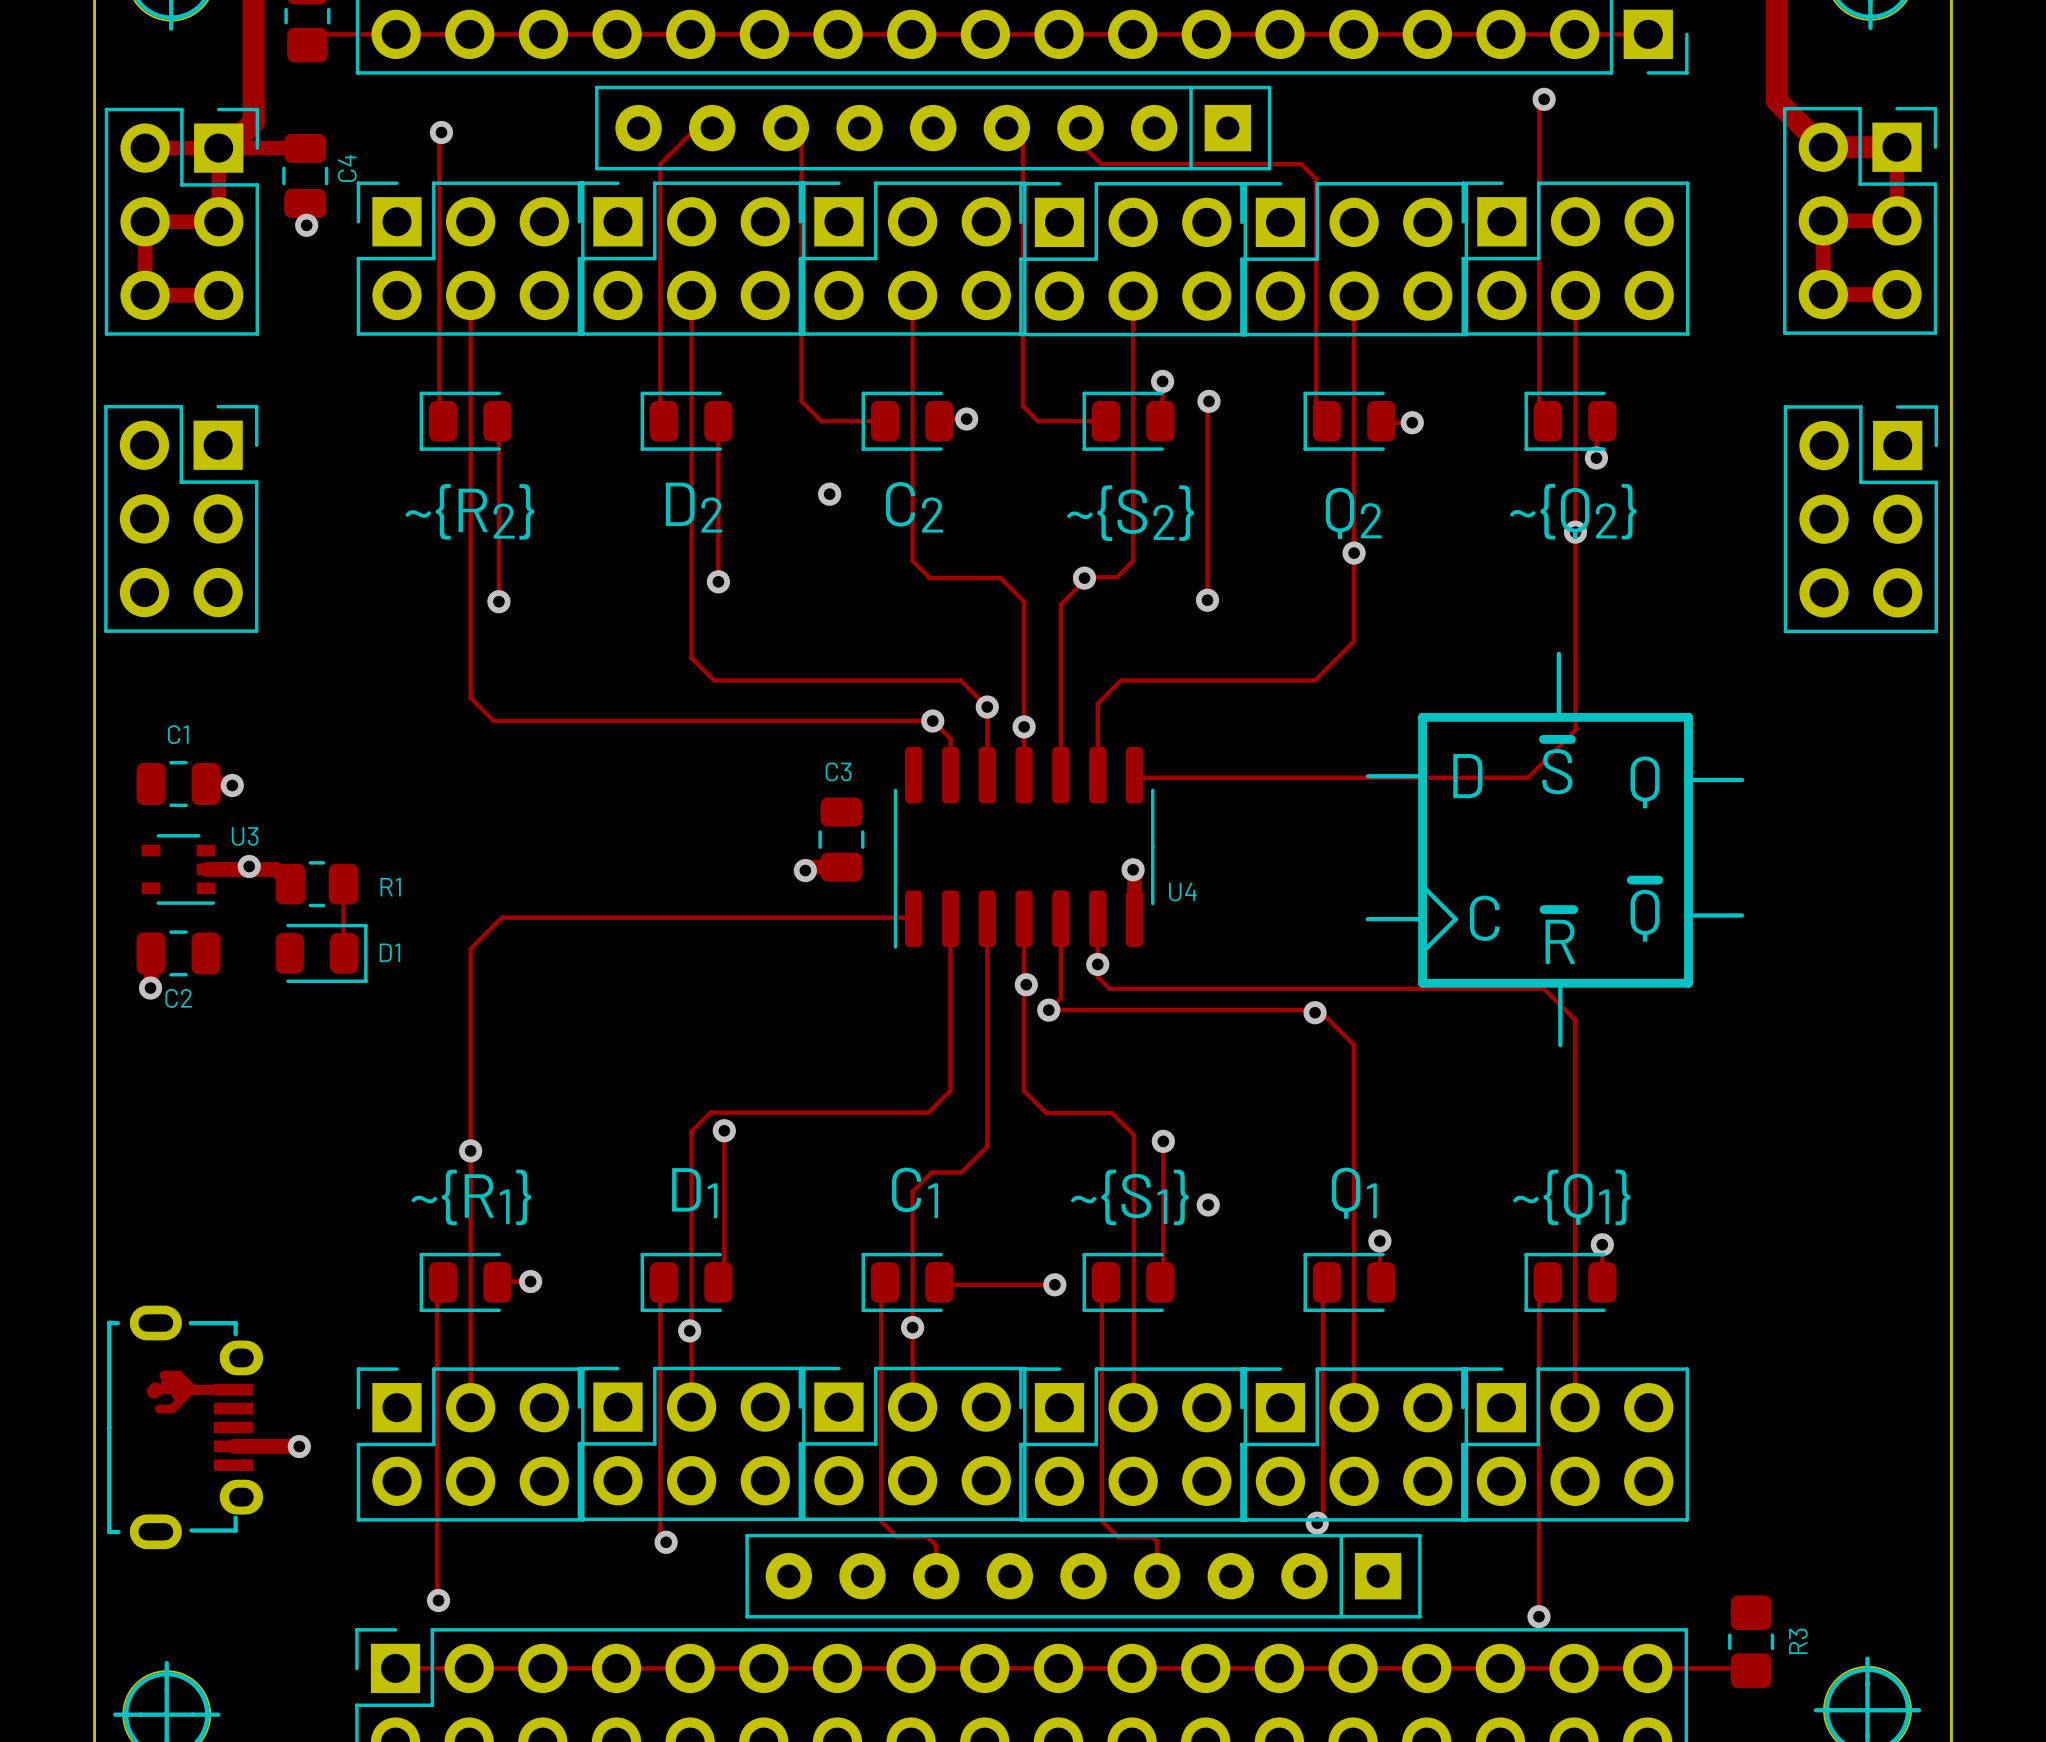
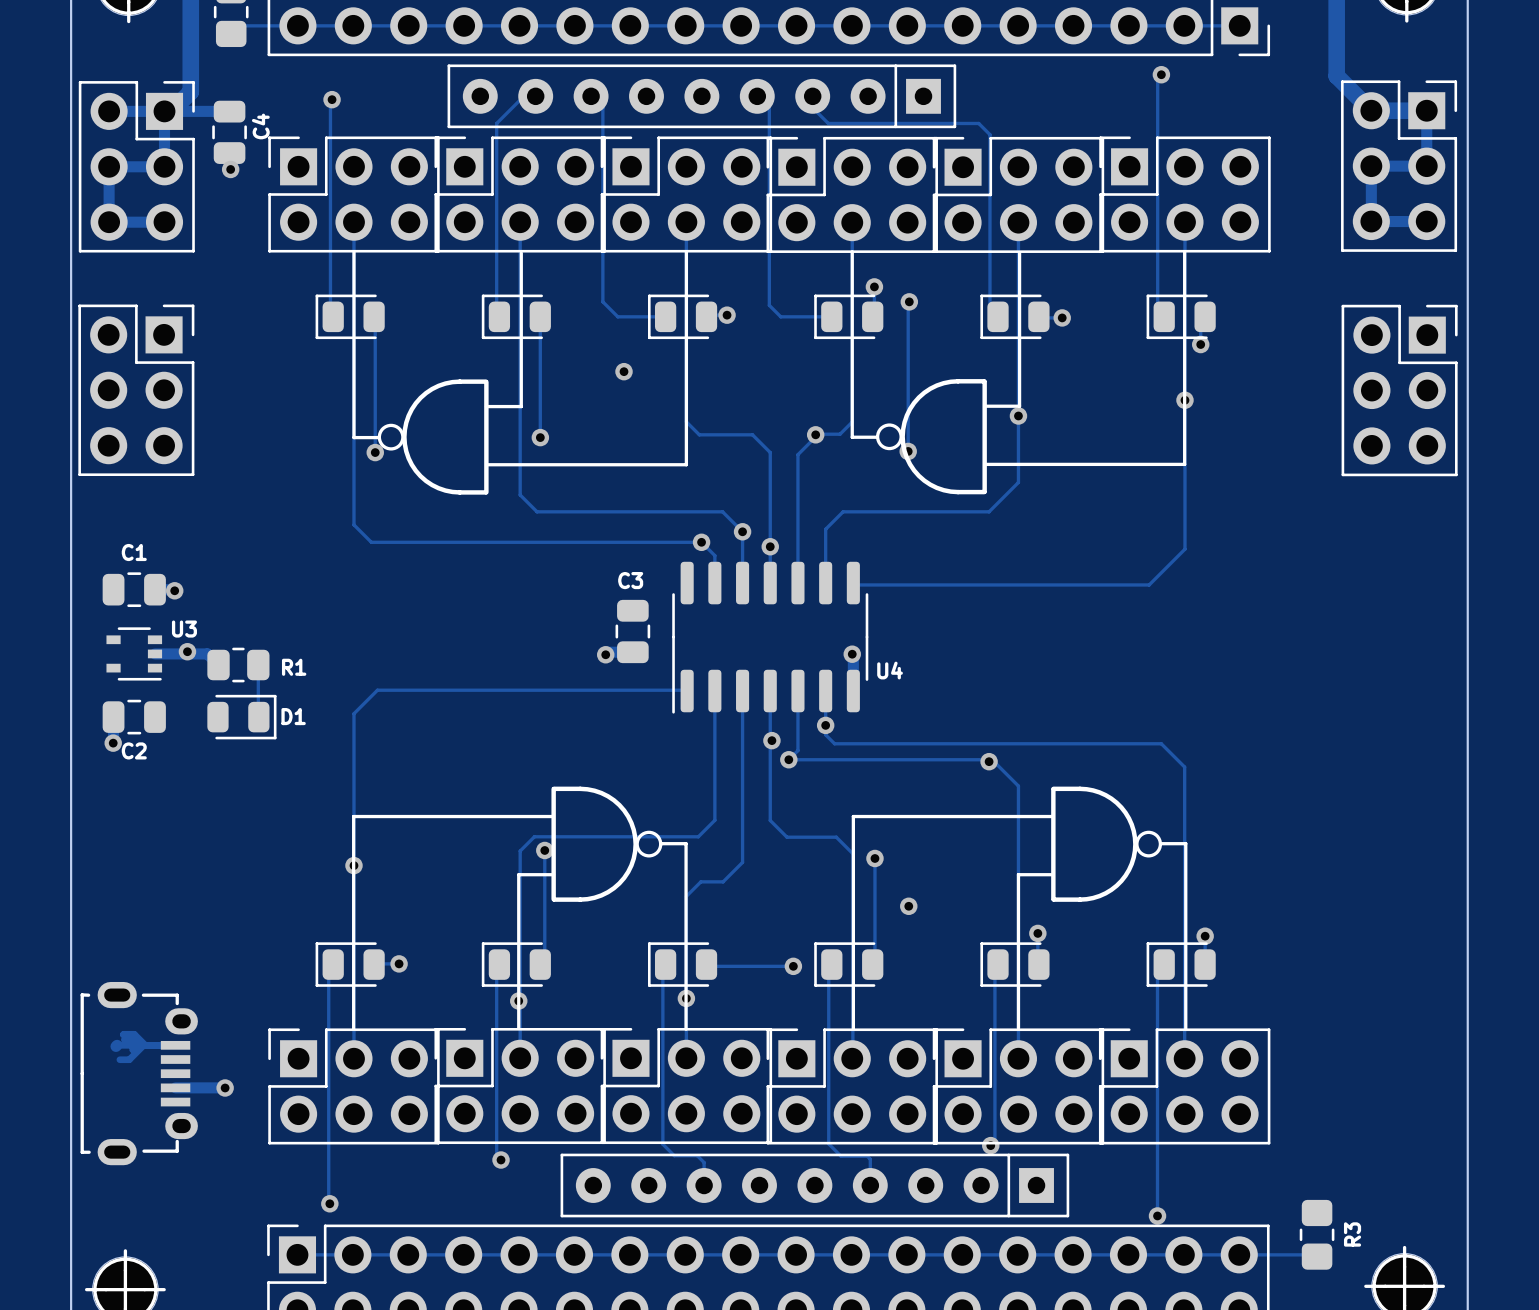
line: none -> (852, 251) (852, 437) (877, 437)
line: none -> (1184, 251) (1184, 464) (985, 464)
line: none -> (353, 252) (353, 437) (378, 437)
line: none -> (686, 252) (686, 464) (487, 464)
line: none -> (521, 253) (521, 406) (486, 406)
line: none -> (1019, 252) (1019, 406) (984, 406)
line: none -> (984, 381) (950, 381) (936, 385) (924, 392) (910, 408) (904, 422) (902, 436) (904, 451) (910, 464) (924, 480) (936, 487) (950, 491) (984, 492)
line: none -> (485, 381) (452, 382) (438, 385) (426, 393) (411, 409) (406, 422) (404, 437) (406, 451) (411, 464) (426, 480) (438, 488) (452, 491) (485, 492)
line: none -> (486, 382) (486, 492)
text: D2 (694, 507) -> none
text: C2 (914, 507) -> none
line: none -> (984, 381) (984, 491)
text: ~{R2} (469, 511) -> none
text: ~{Q2} (1573, 511) -> none
text: ~{S2} (1130, 513) -> none
text: Q2 (1353, 513) -> none
drawing: none -> [875, 423, 903, 451]
drawing: none -> [377, 423, 405, 451]
line: (1558, 653) (1558, 715) -> none
line: (1422, 717) (1688, 717) (1688, 983) (1422, 983) (1422, 717) -> none
text: ~{S} (1557, 766) -> none
line: (1368, 776) (1421, 776) -> none
text: D (1467, 776) -> none
line: (1688, 779) (1741, 779) -> none
text: Q (1645, 782) -> none
line: (1422, 886) (1455, 919) (1422, 952) -> none
text: ~{Q} (1645, 910) -> none
line: (1688, 915) (1741, 915) -> none
text: C (1484, 918) -> none
line: (1367, 919) (1421, 919) -> none
text: ~{R} (1559, 936) -> none
line: (1560, 983) (1560, 1045) -> none
line: none -> (554, 788) (587, 789) (601, 793) (613, 800) (624, 810) (631, 823) (635, 844) (631, 865) (624, 877) (613, 888) (601, 895) (587, 899) (554, 899)
line: none -> (1053, 788) (1086, 789) (1099, 792) (1111, 798) (1121, 807) (1129, 818) (1133, 830) (1135, 844) (1133, 857) (1129, 869) (1121, 880) (1111, 889) (1099, 896) (1086, 899) (1053, 899)
line: none -> (553, 788) (553, 899)
line: none -> (1053, 788) (1053, 899)
line: none -> (552, 816) (353, 816) (353, 1029)
line: none -> (1052, 816) (853, 816) (853, 1029)
drawing: none -> [635, 830, 663, 858]
drawing: none -> [1135, 830, 1163, 858]
line: none -> (661, 843) (686, 843) (686, 1029)
line: none -> (1160, 843) (1185, 843) (1185, 1029)
line: none -> (553, 874) (518, 874) (518, 1028)
line: none -> (1053, 874) (1018, 874) (1018, 1028)
text: C1 (915, 1192) -> none
text: D1 (694, 1193) -> none
text: Q1 (1354, 1193) -> none
text: ~{R1} (471, 1197) -> none
text: ~{S1} (1129, 1197) -> none
text: ~{Q1} (1571, 1197) -> none

